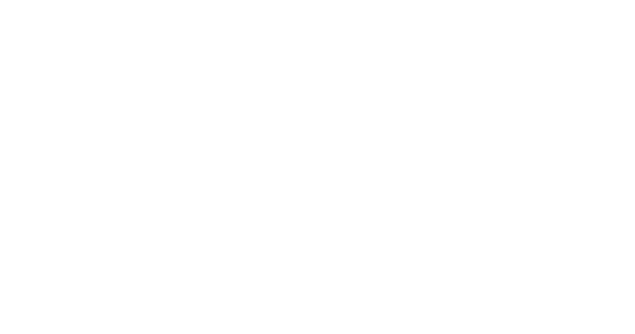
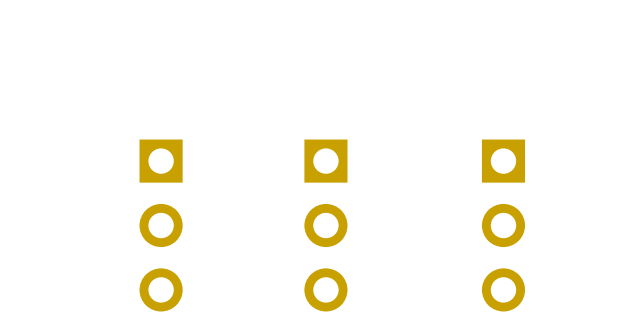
part: none -> (161, 225)
part: none -> (325, 225)
part: none -> (503, 225)

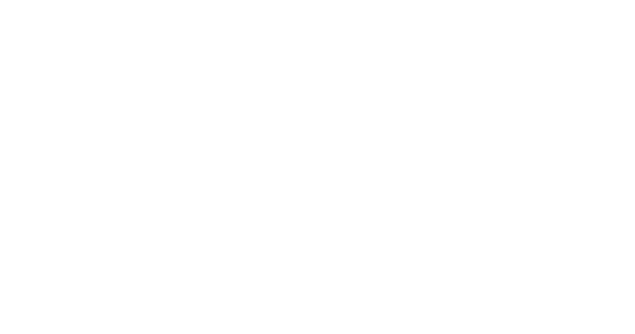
part: (161, 225) -> none
part: (325, 225) -> none
part: (503, 225) -> none

